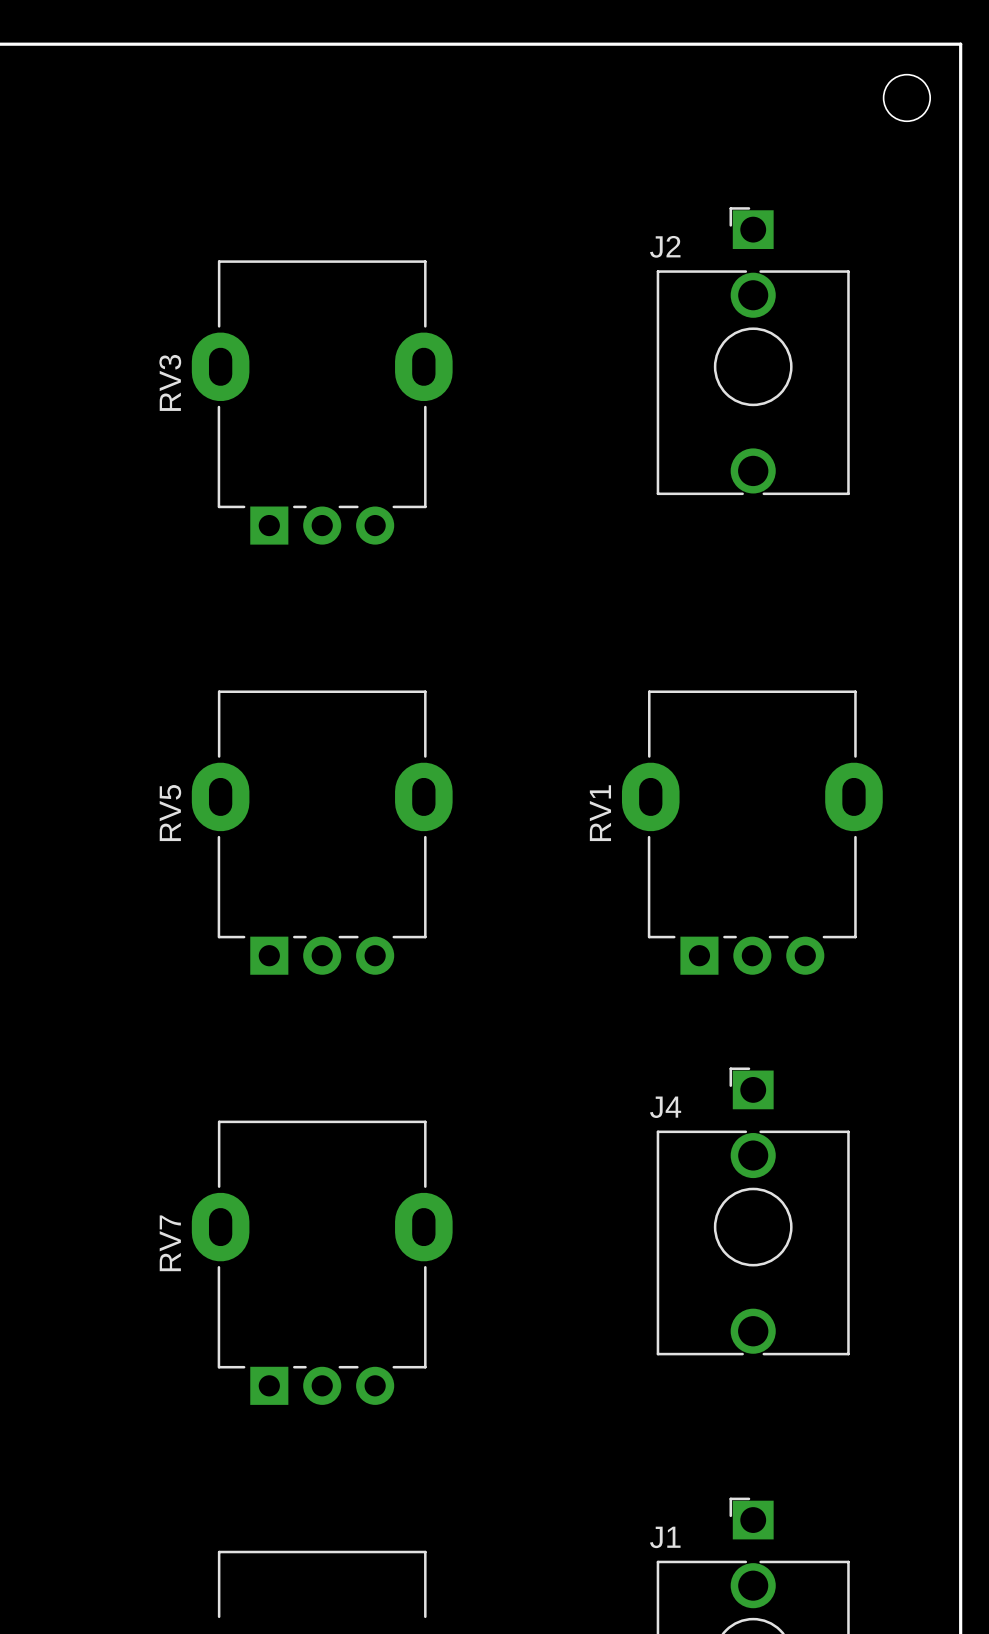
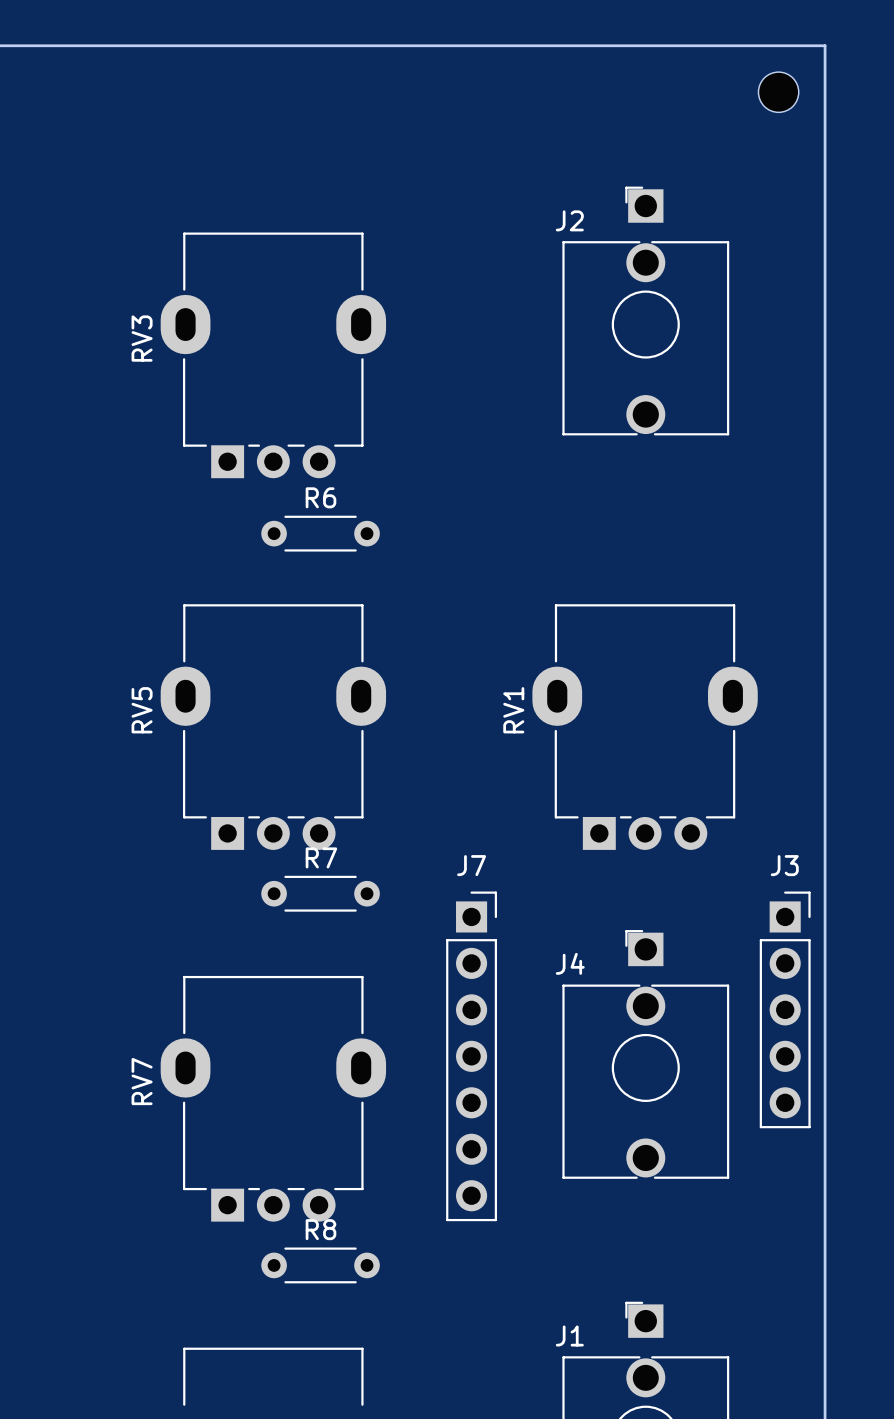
R6: none -> (320, 533)
R7: none -> (320, 893)
J3: none -> (785, 1009)
J7: none -> (471, 1056)
R8: none -> (320, 1265)

